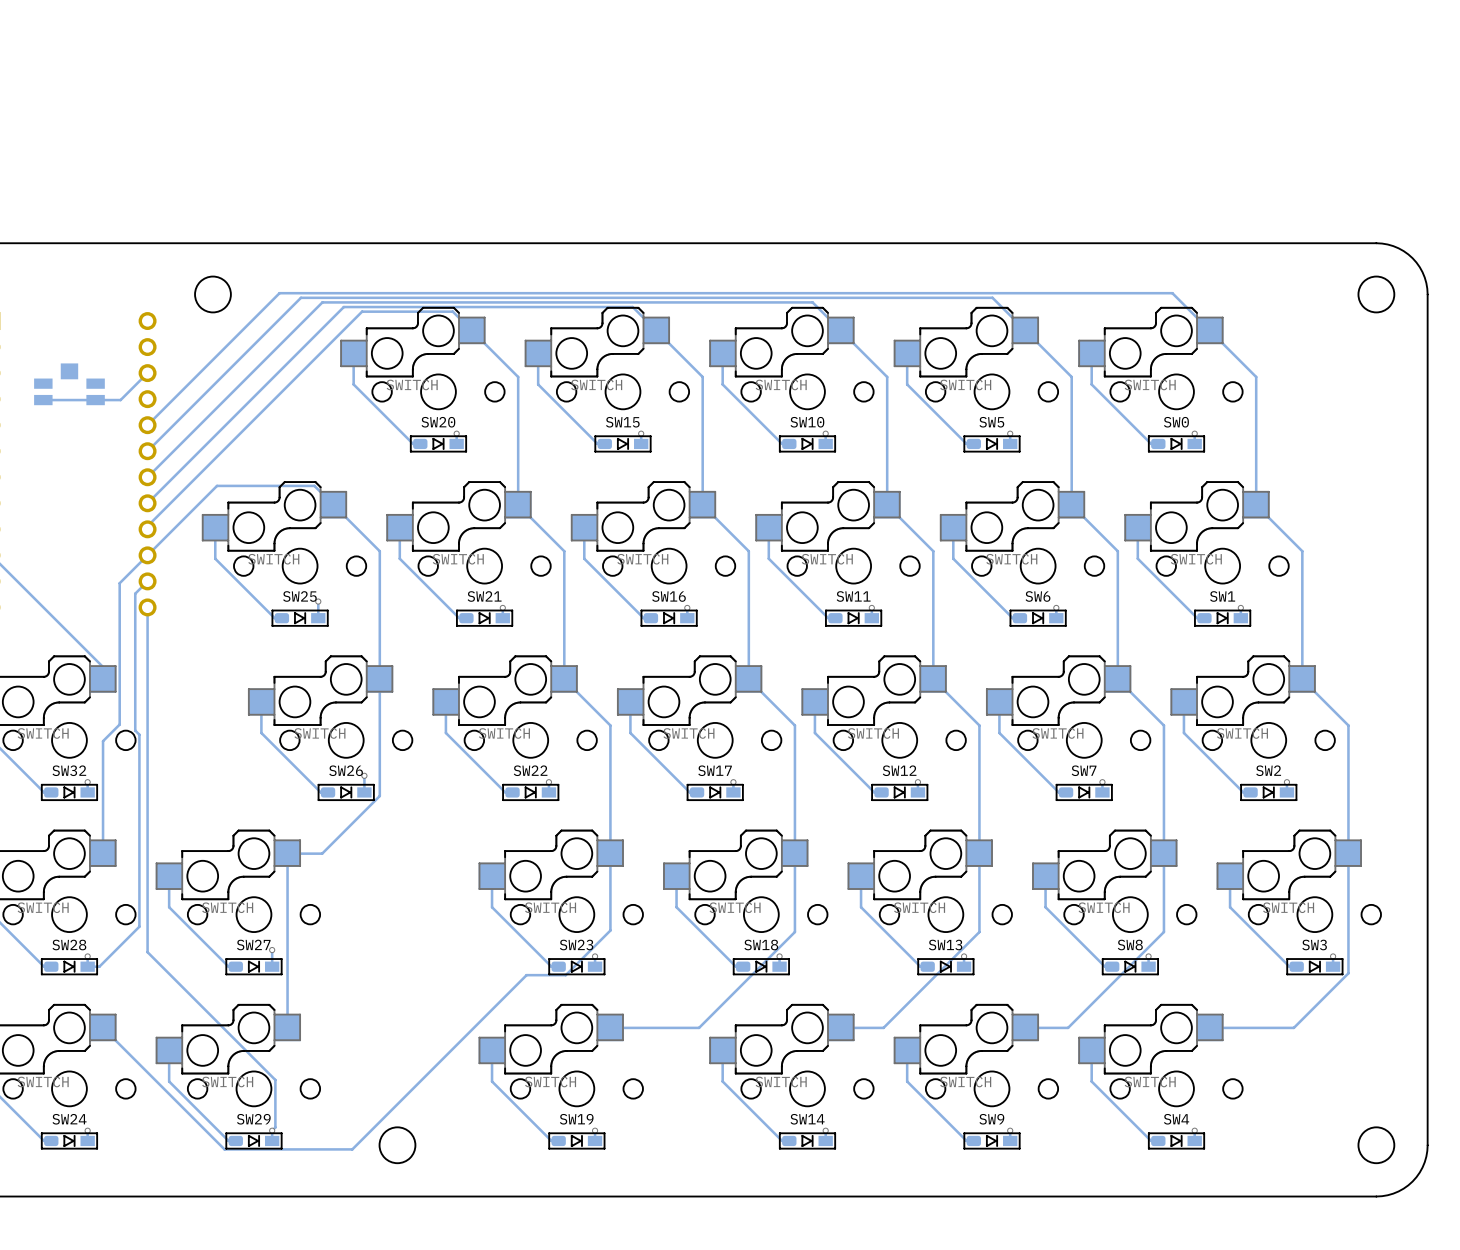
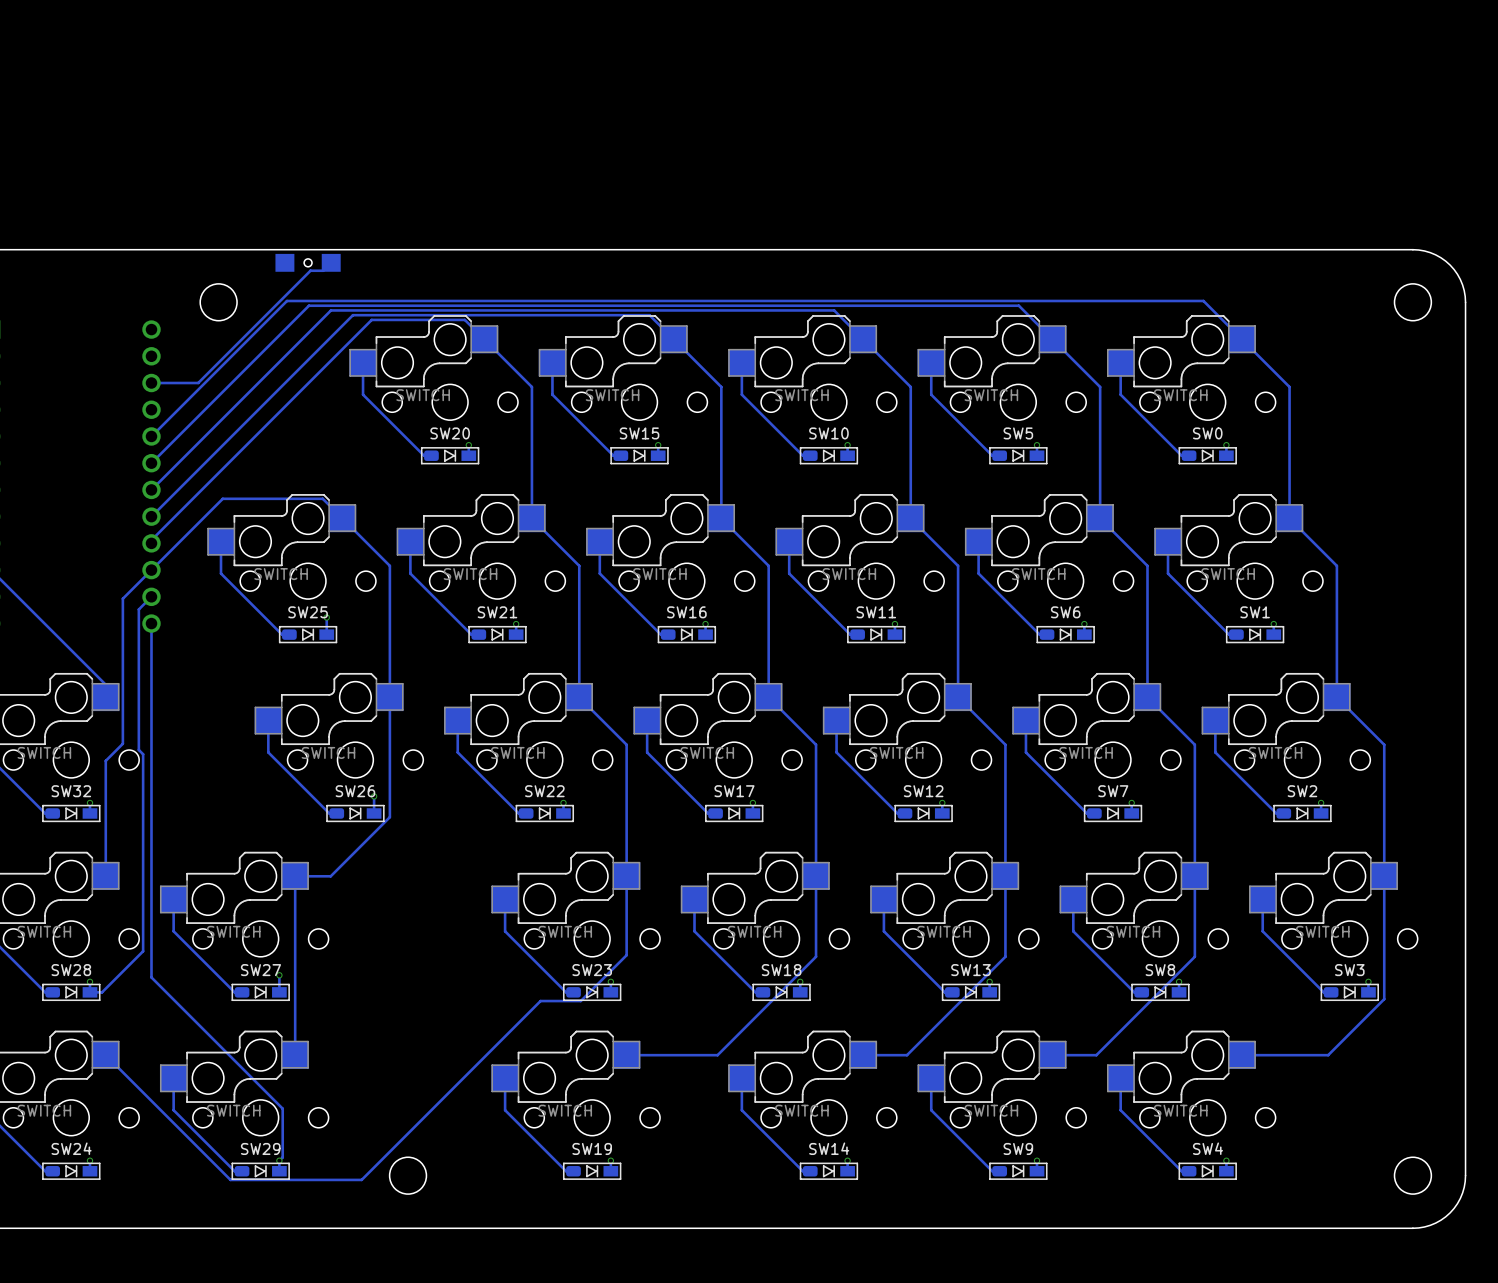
part: none -> (308, 262)
track: (147, 373) (120, 400) (43, 400) -> (151, 383) (198, 383) (310, 270) (323, 270) (331, 262)
part: (69, 384) -> none

